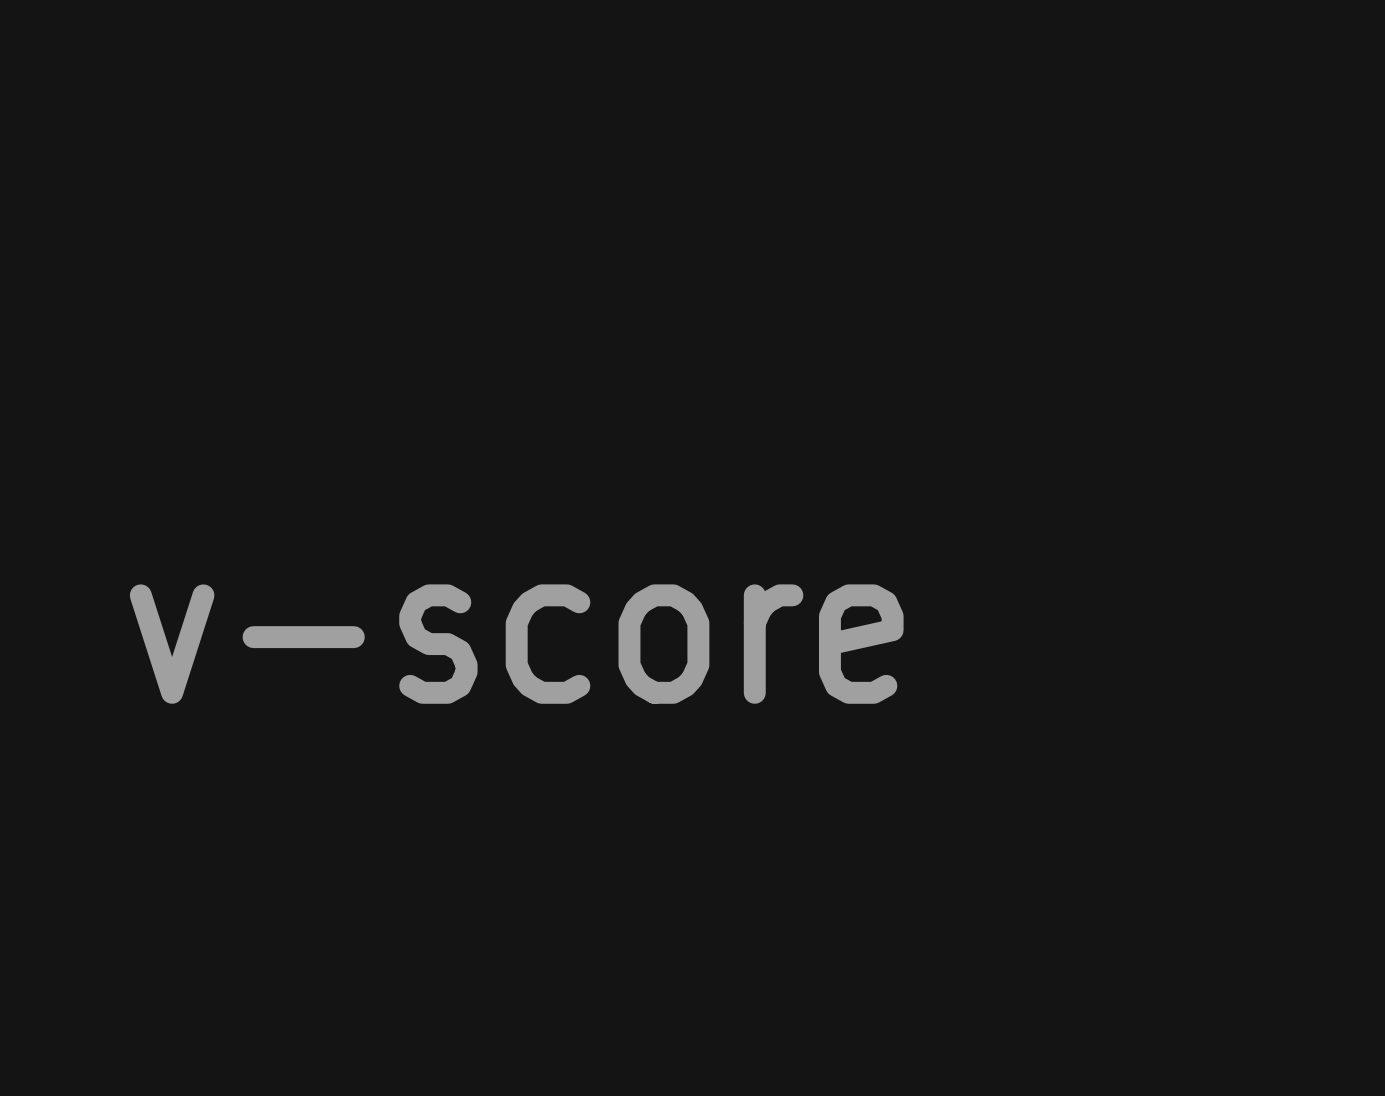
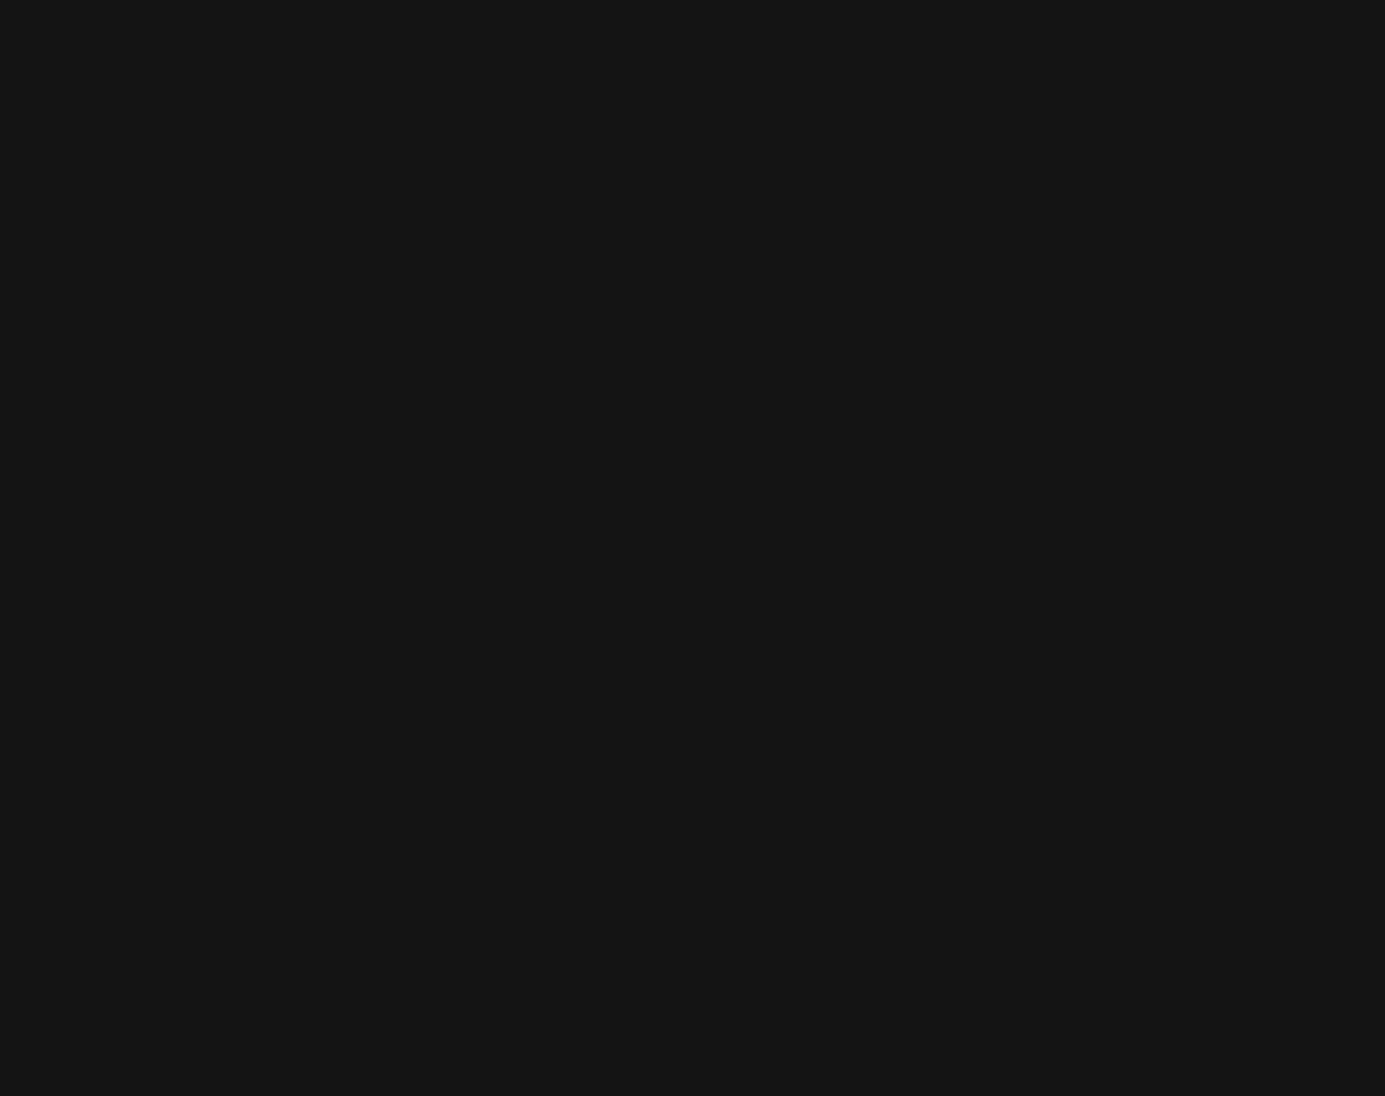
text: v-score (516, 644) -> none

